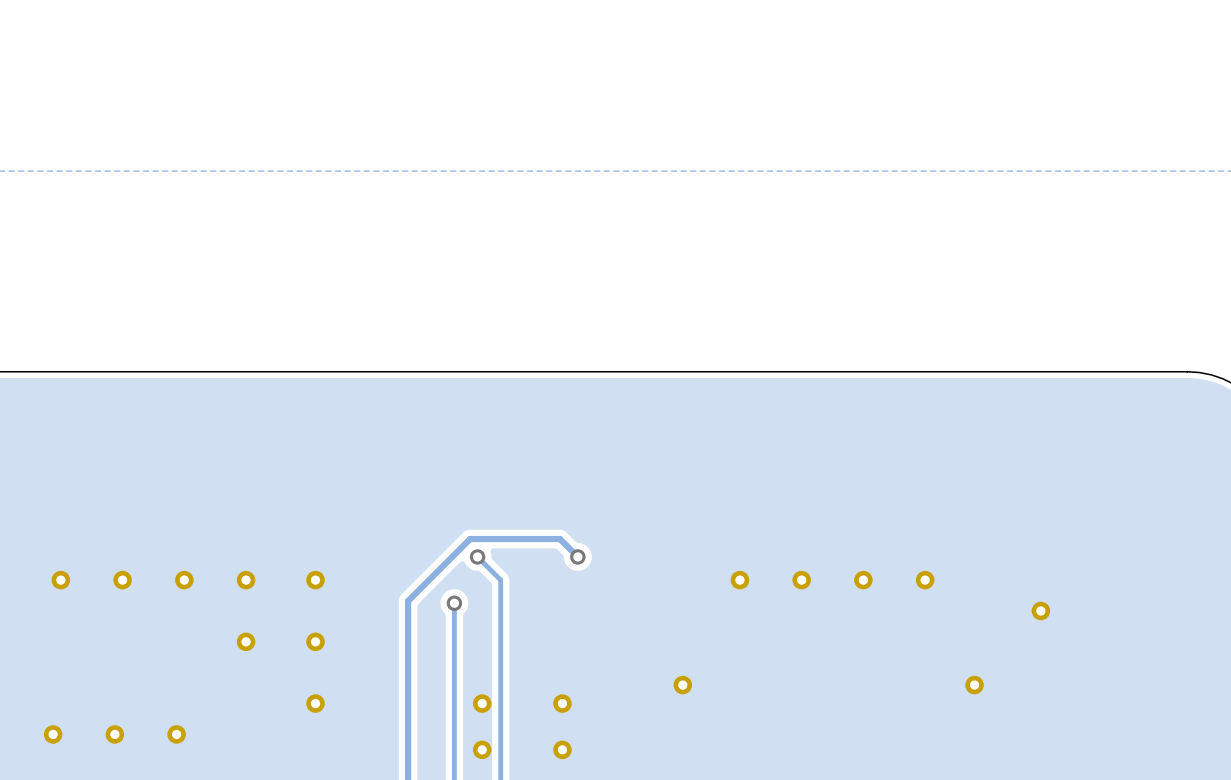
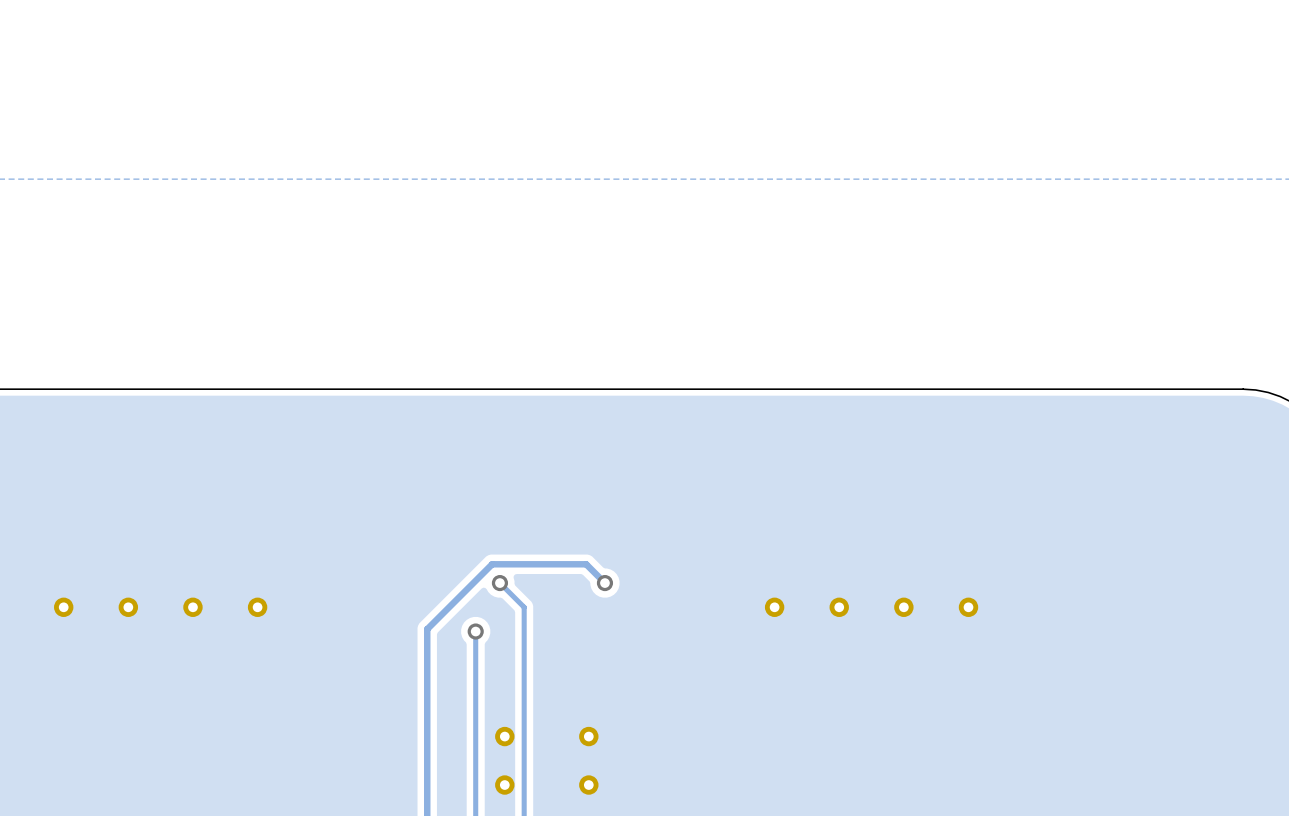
part: (315, 580) -> none
part: (1040, 610) -> none
part: (246, 641) -> none
part: (315, 641) -> none
part: (682, 685) -> none
part: (974, 685) -> none
part: (315, 703) -> none
part: (53, 734) -> none
part: (114, 734) -> none
part: (176, 734) -> none

